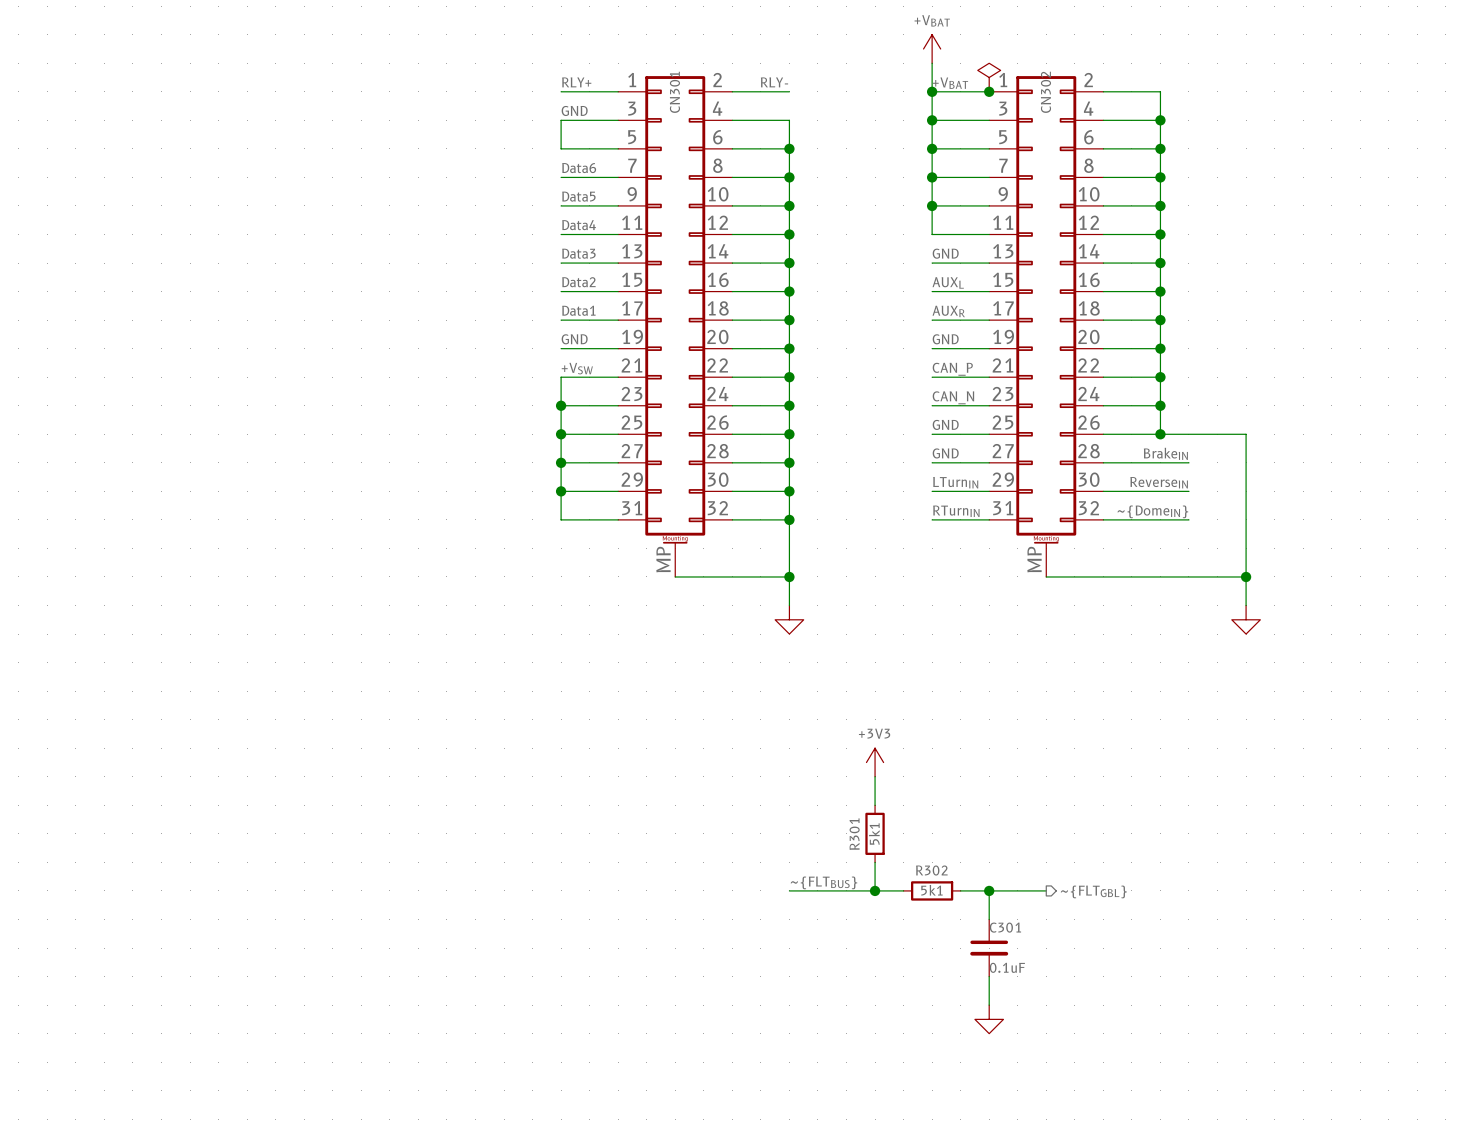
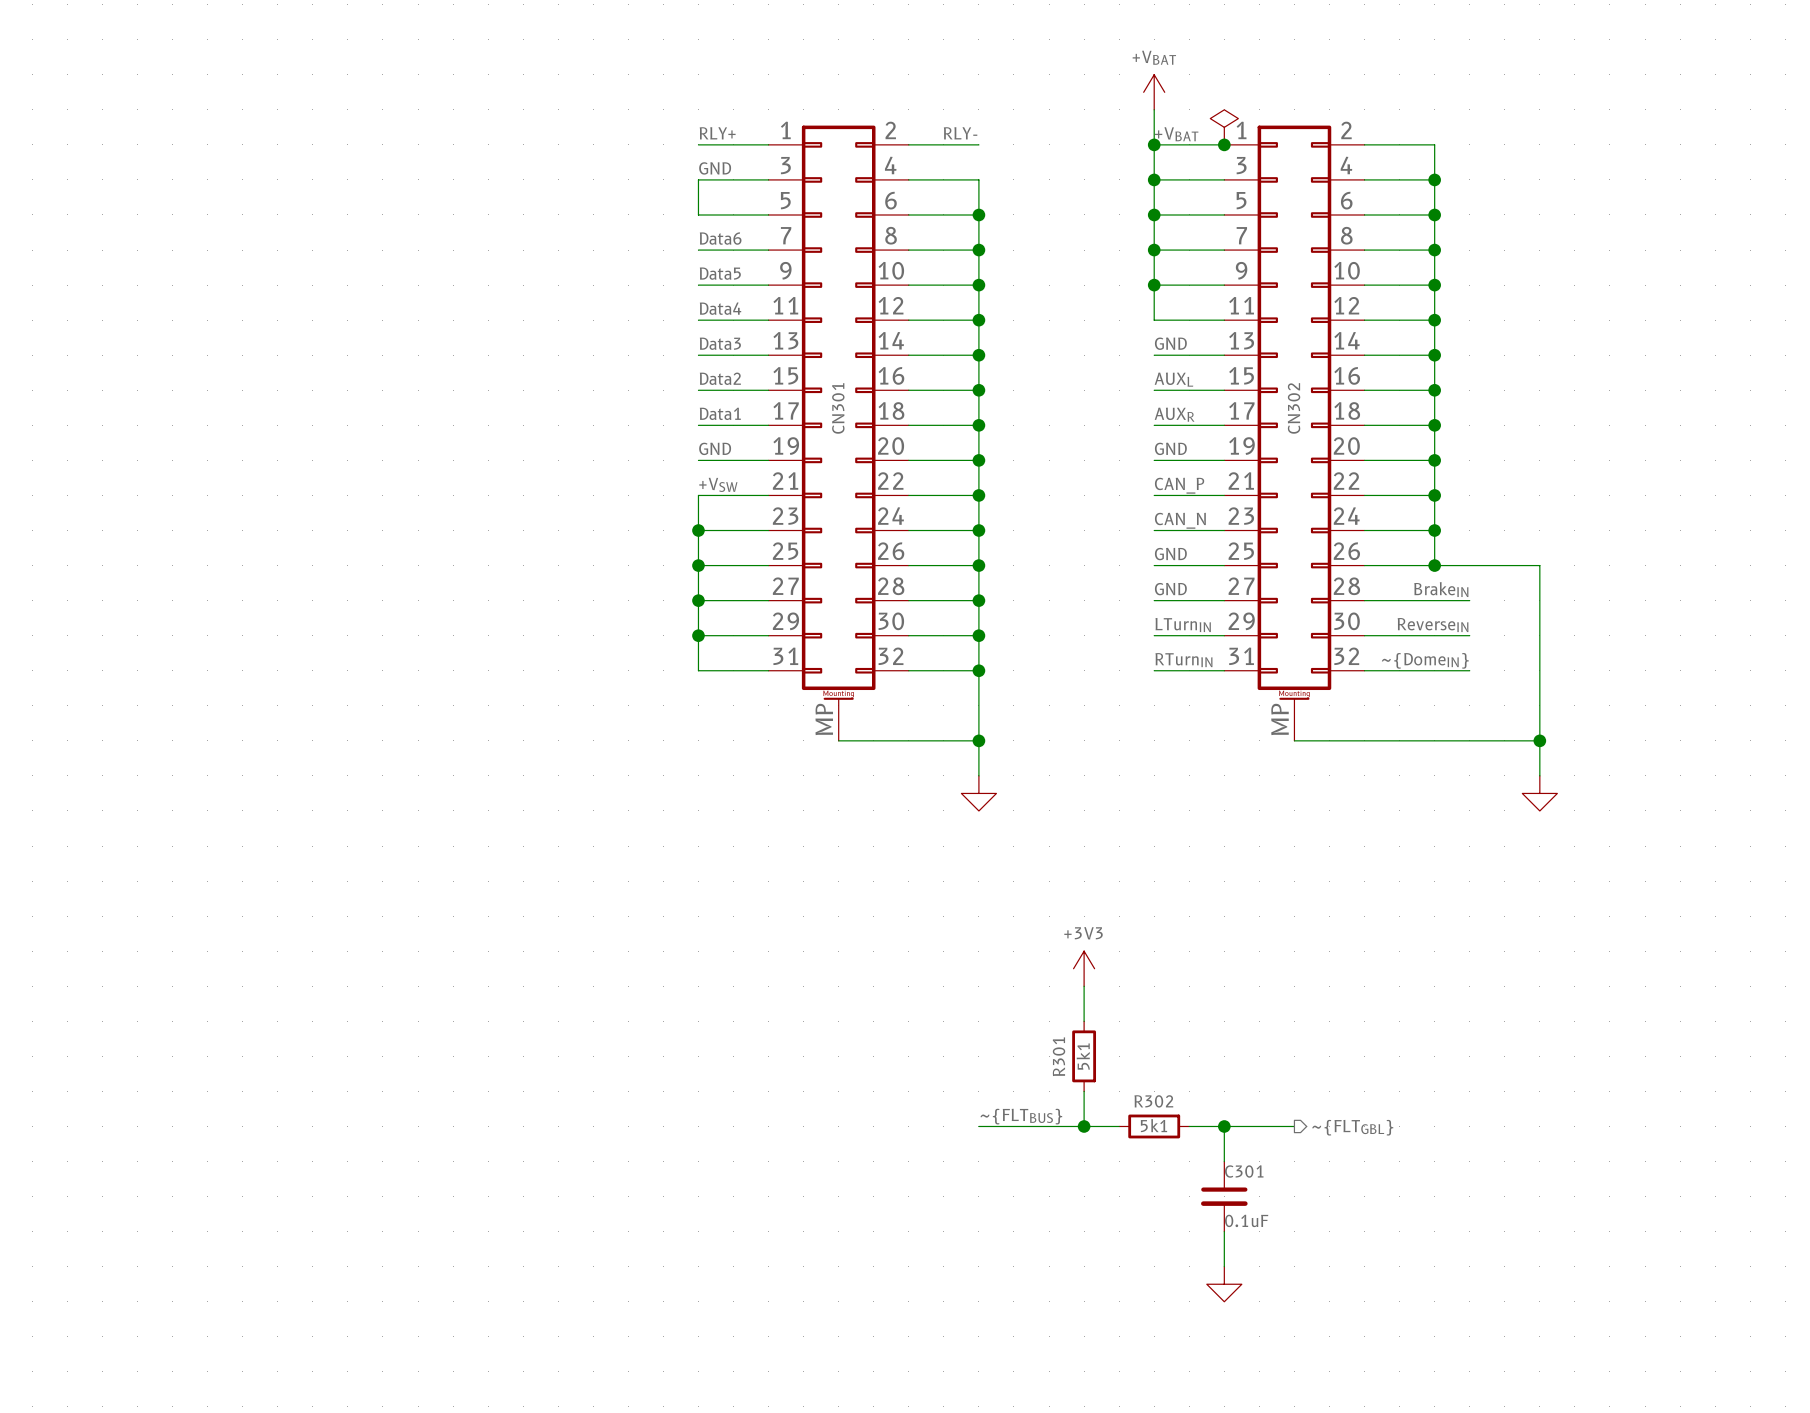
CN301 name position: CN301 (674, 92) -> CN301 (838, 408)
CN302 name position: CN302 (1045, 92) -> CN302 (1294, 408)

